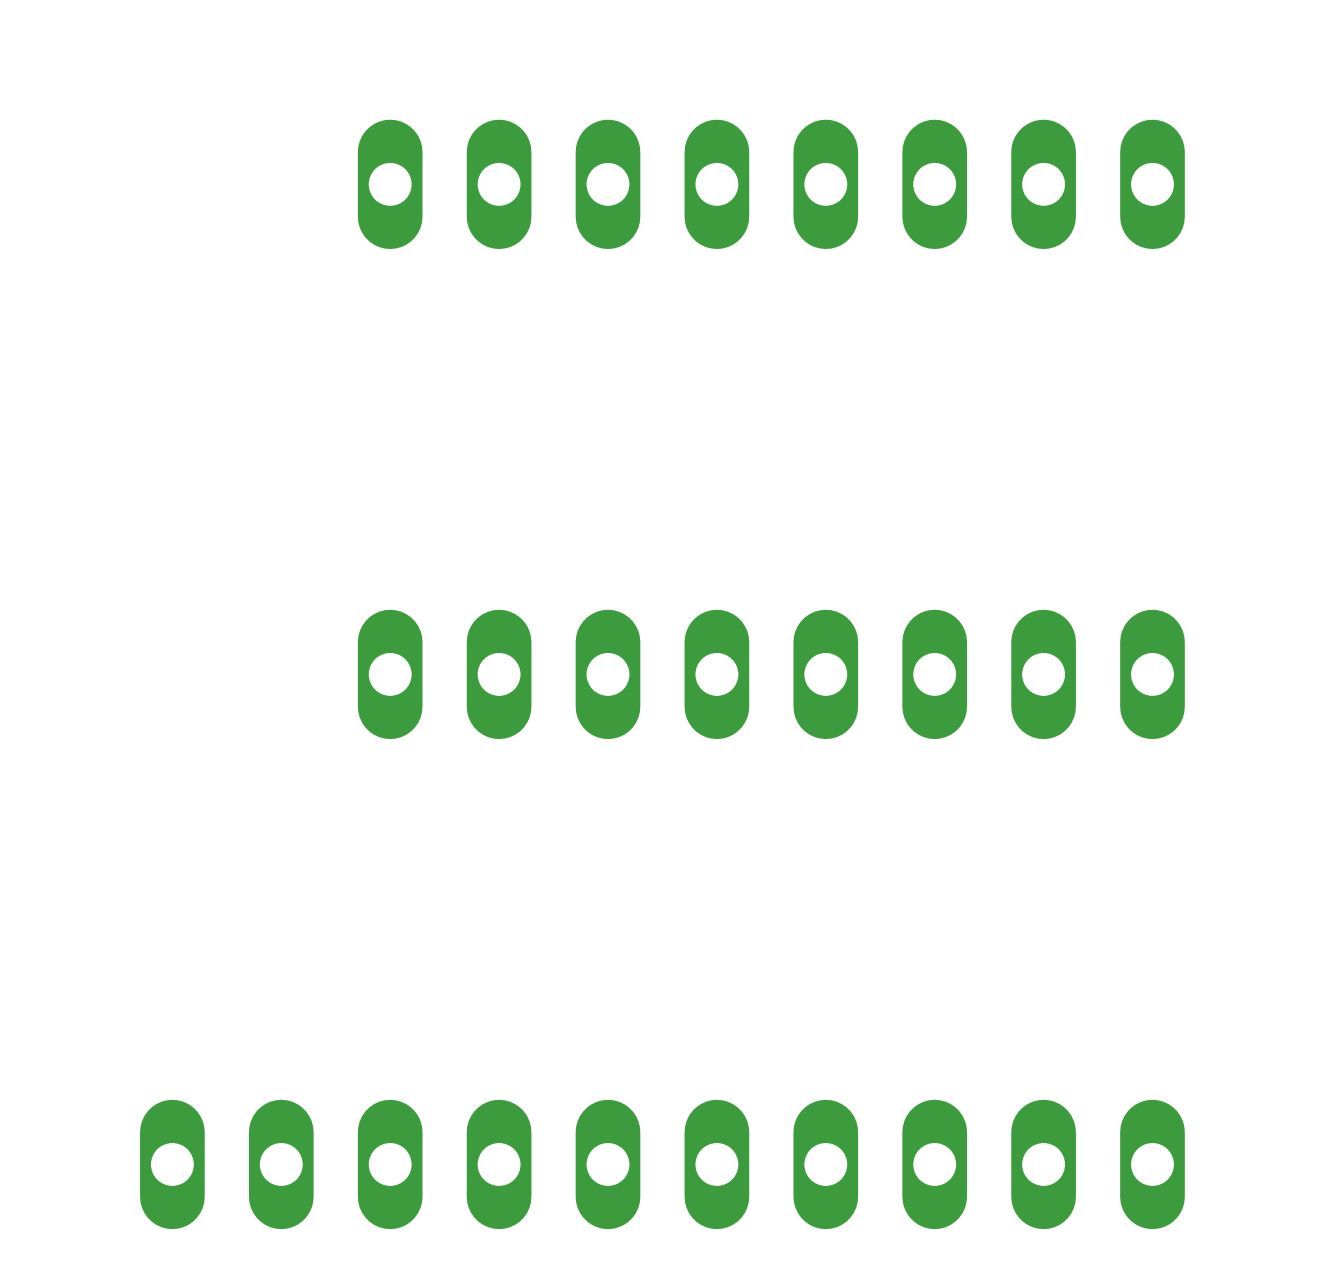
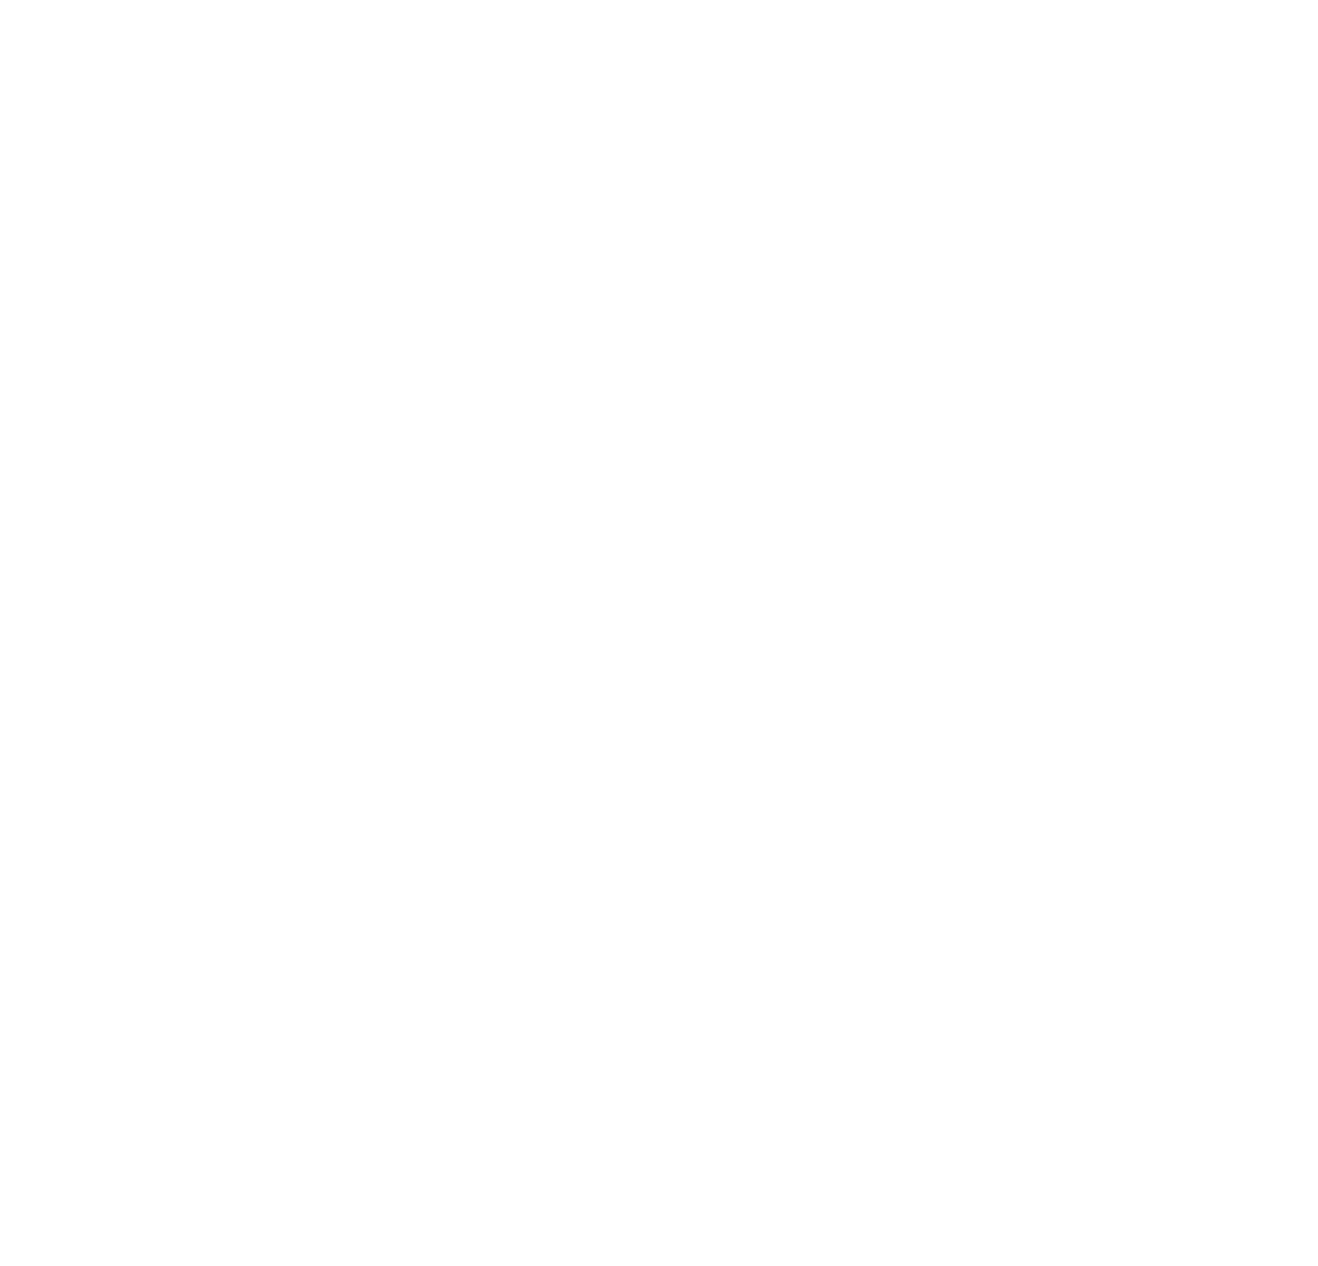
part: (771, 184) -> none
part: (771, 674) -> none
part: (662, 1164) -> none

